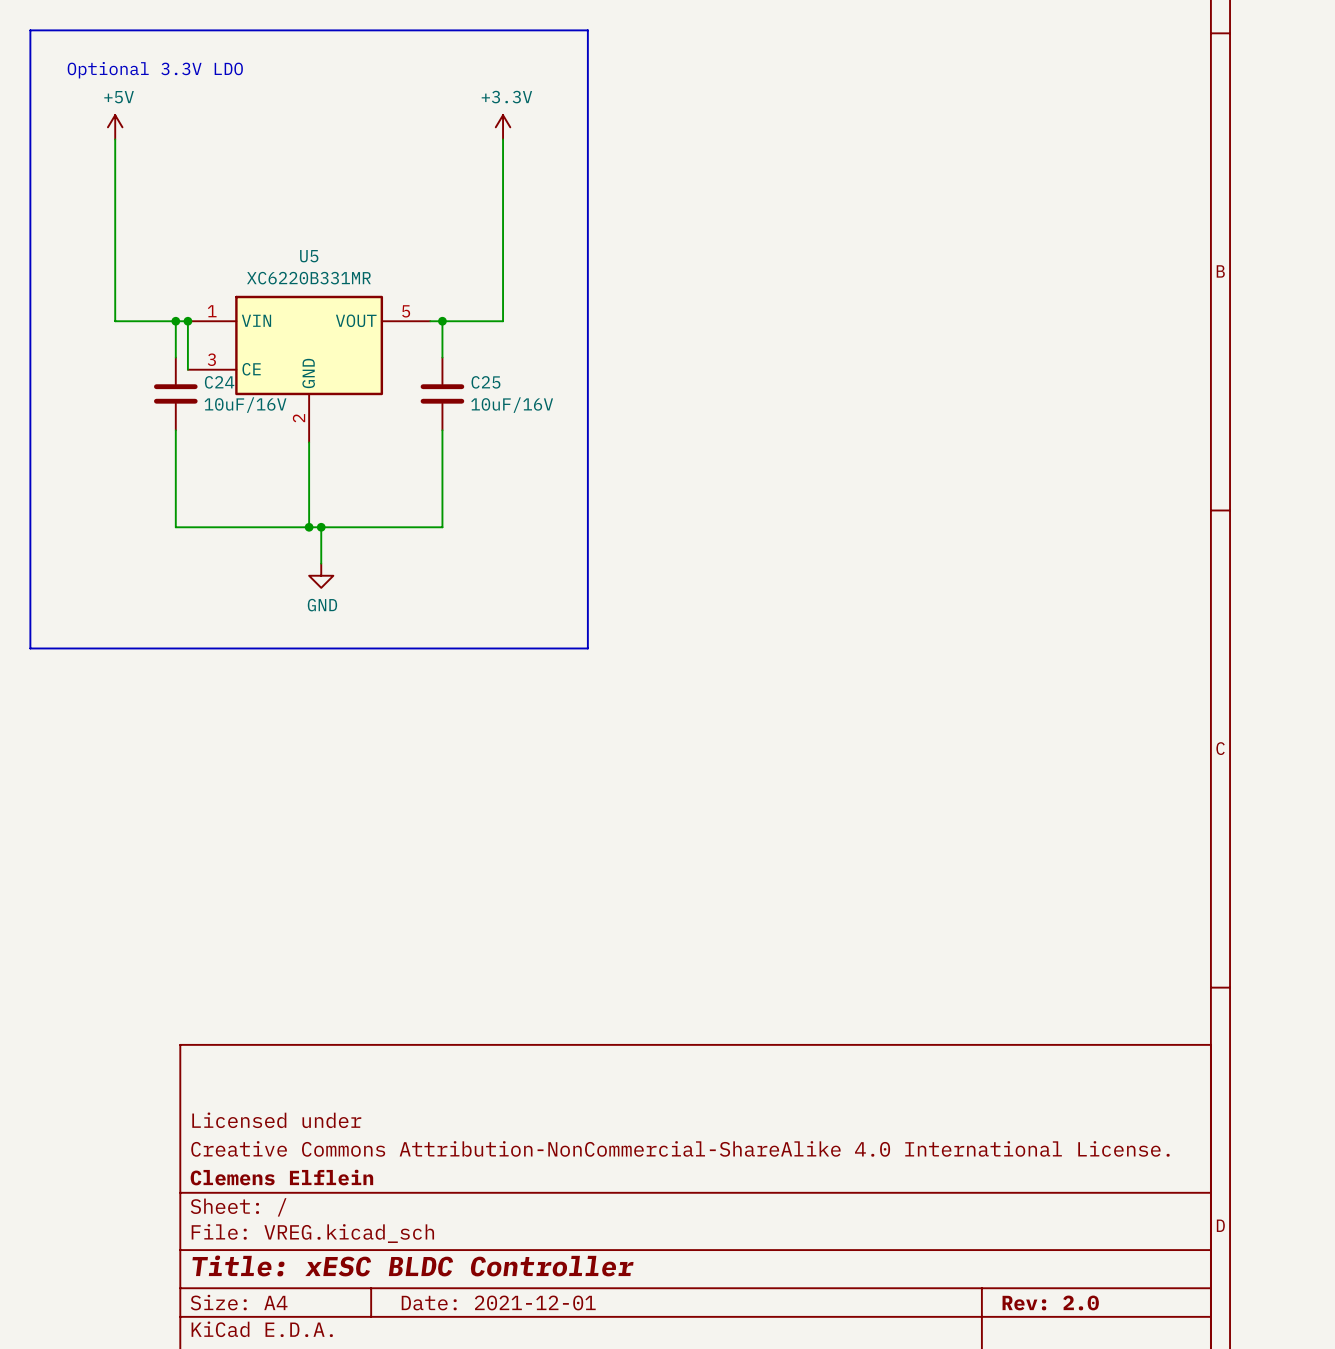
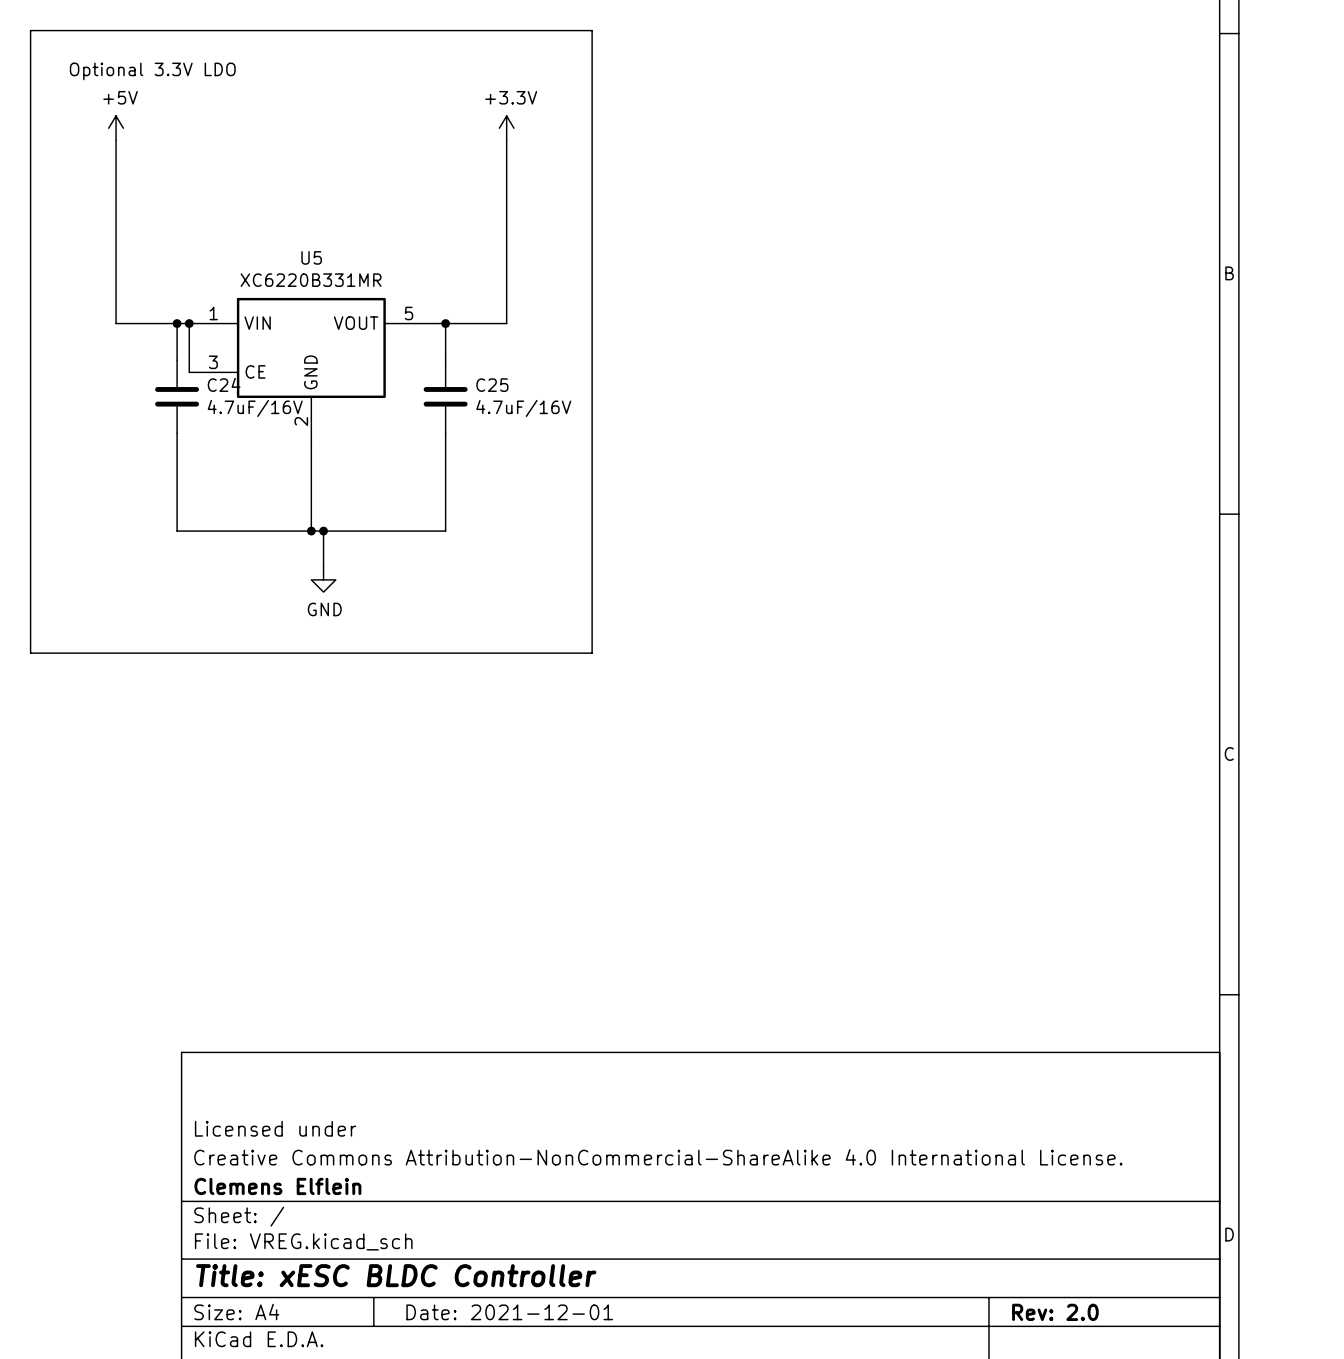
C24 value: 10uF/16V (245, 405) -> 4.7uF/16V (255, 408)
C25 value: 10uF/16V (512, 405) -> 4.7uF/16V (523, 408)

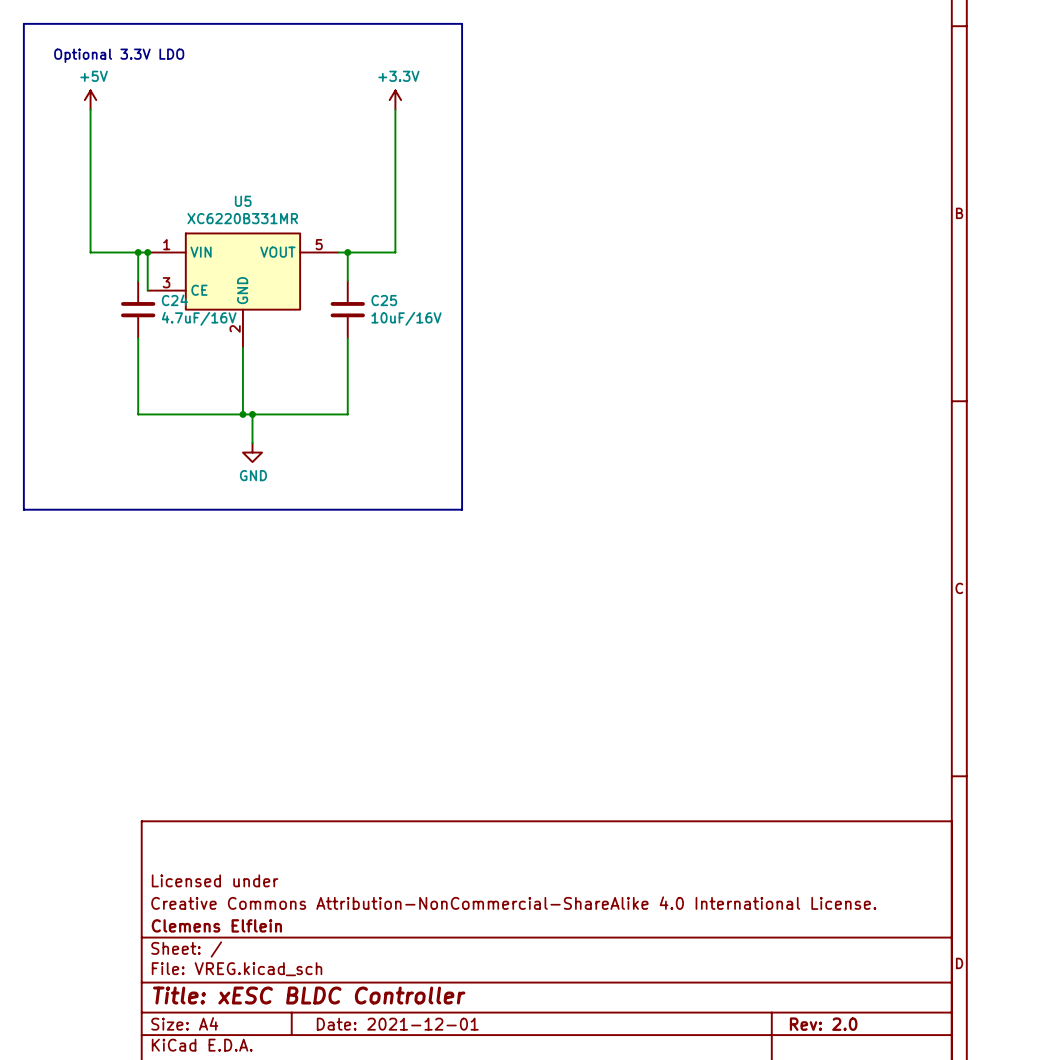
C25 value: 4.7uF/16V (523, 408) -> 10uF/16V (406, 318)

